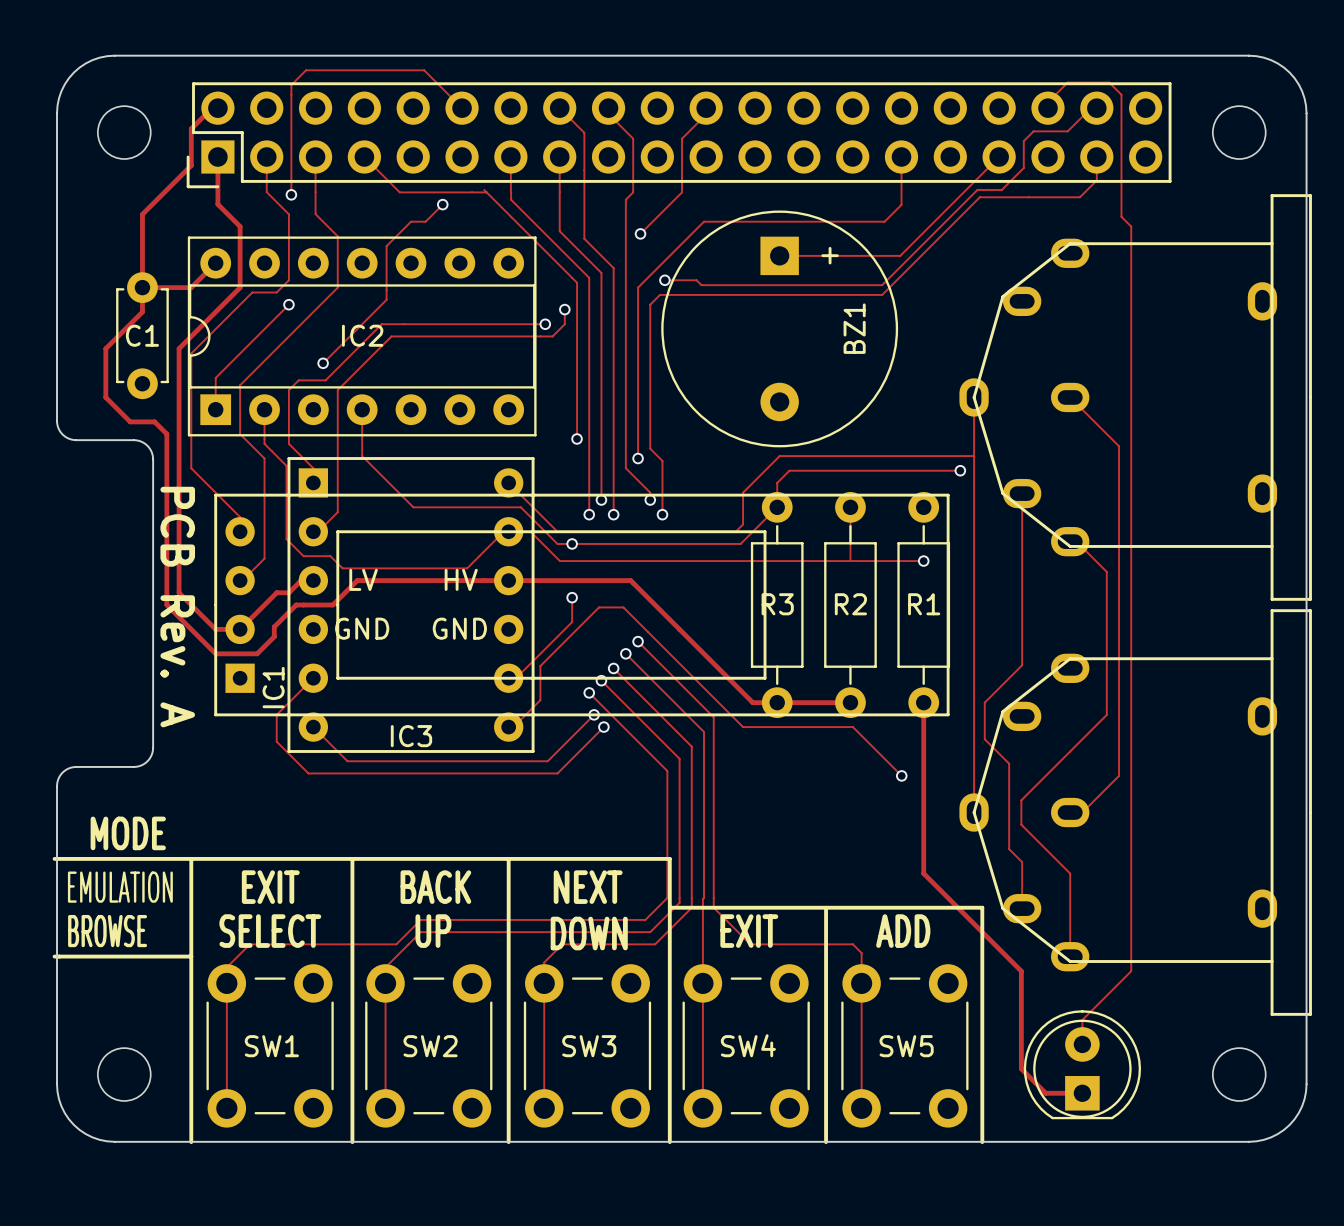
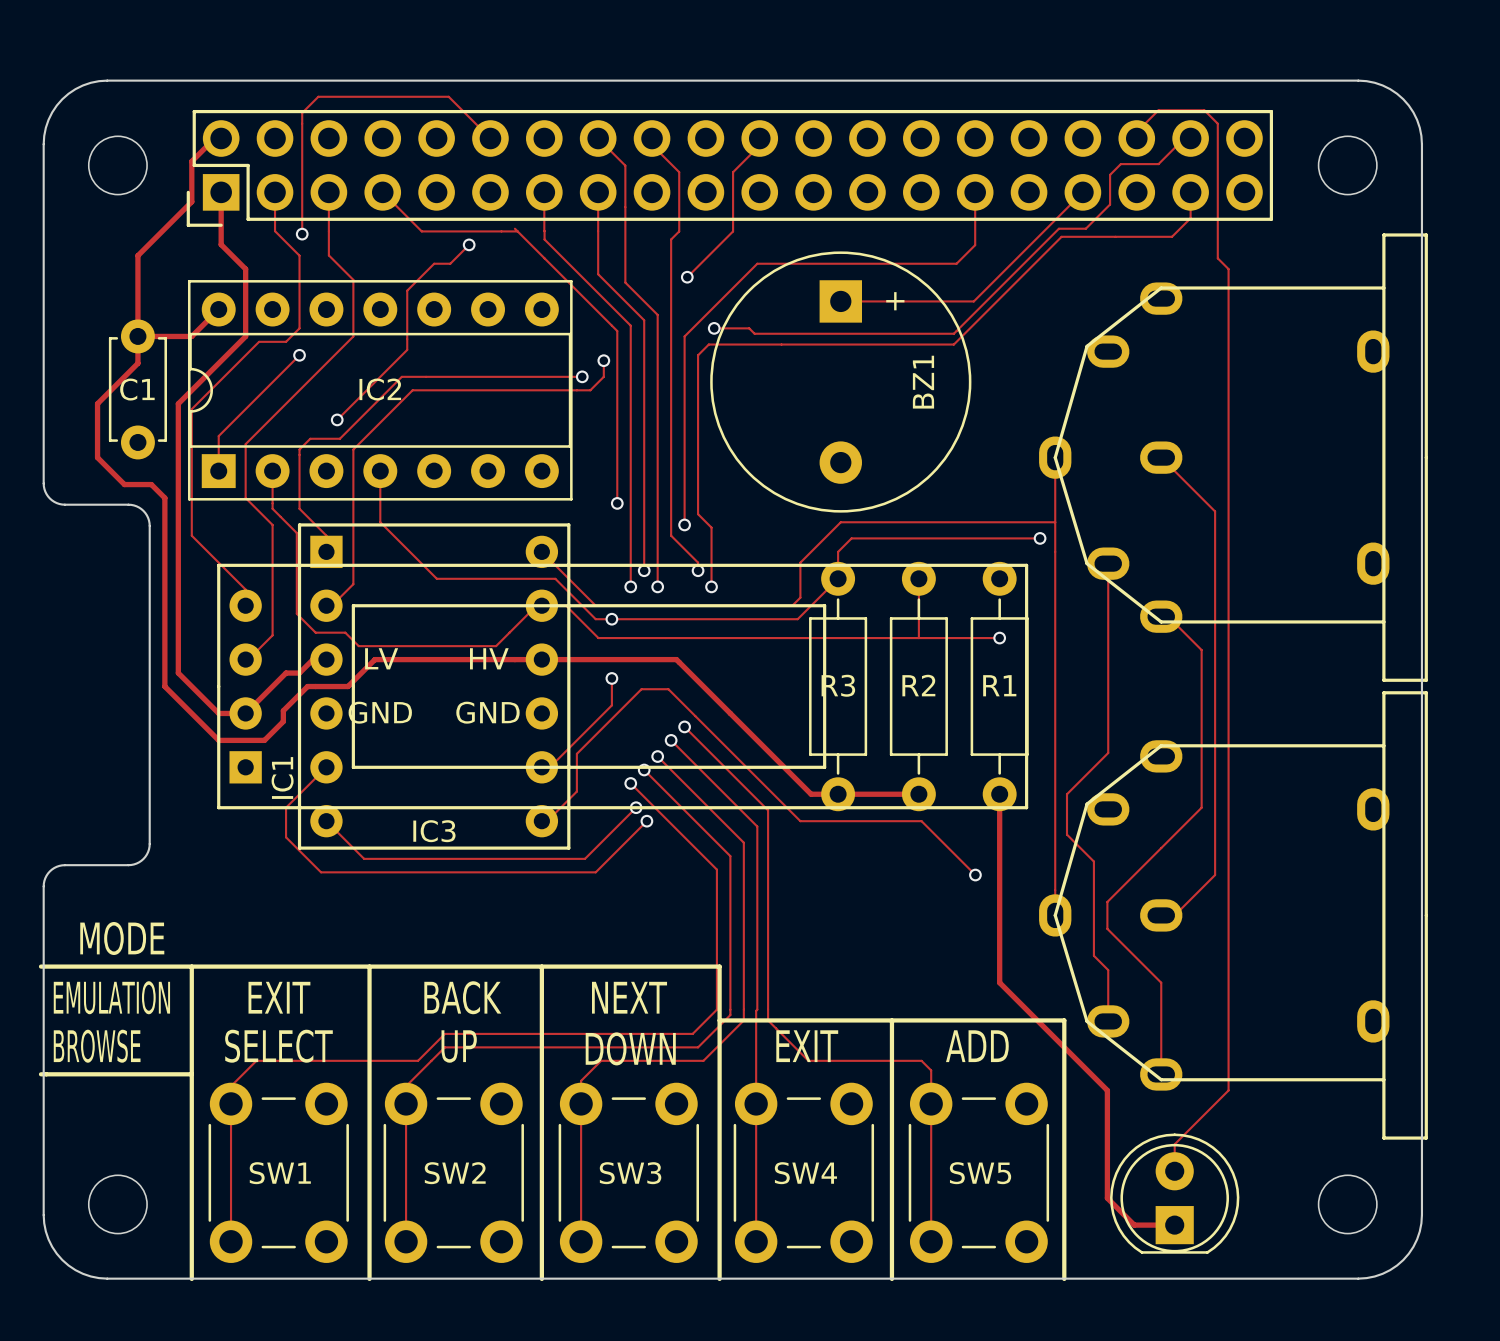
text: PCB Rev. A (177, 607) -> none

